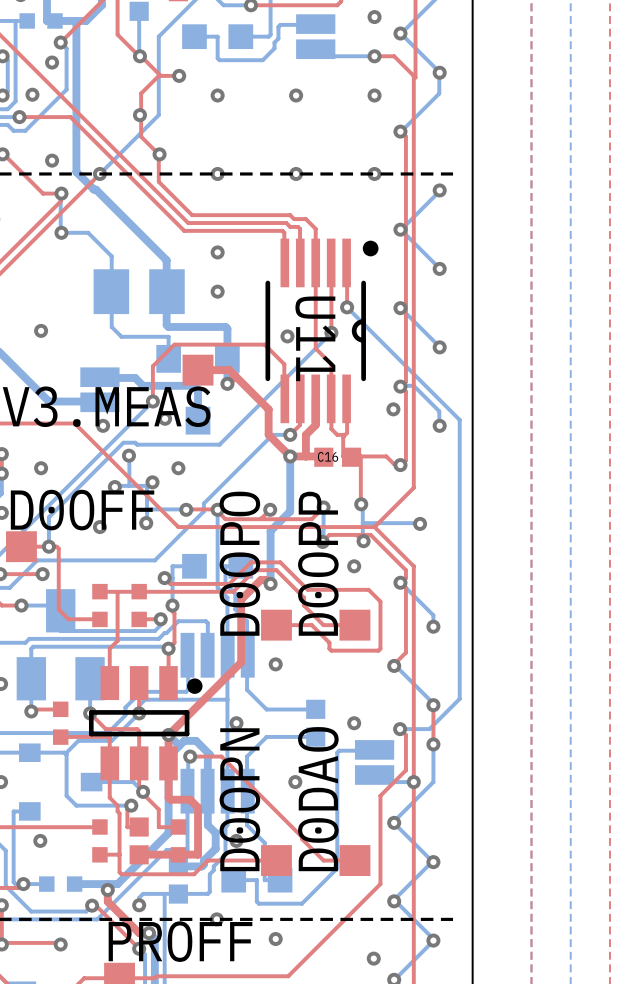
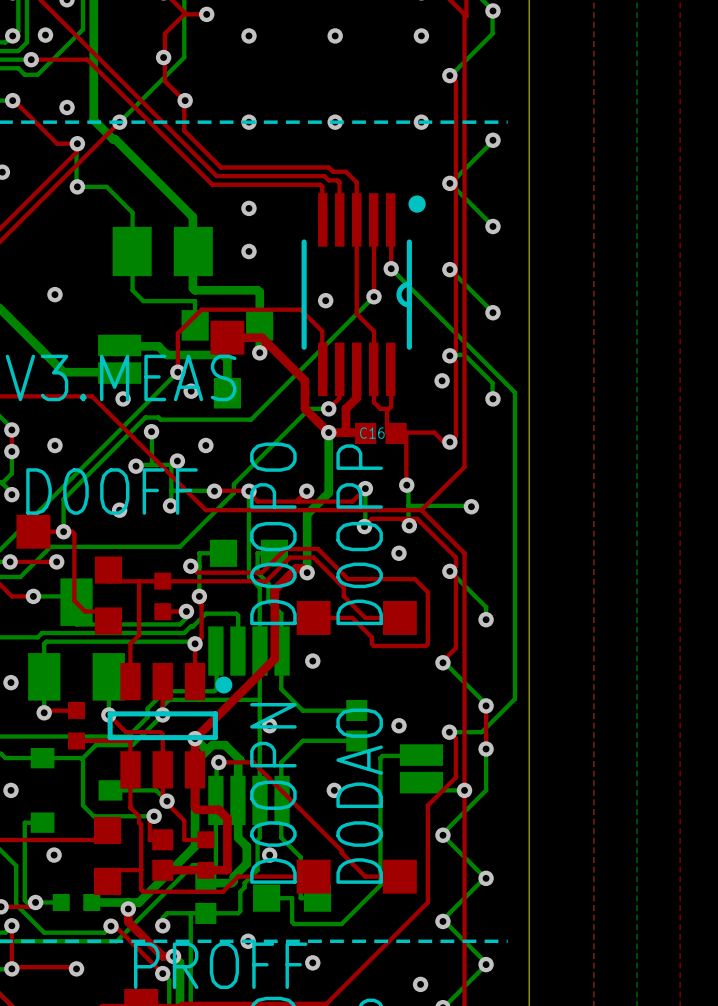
U11 name: U11 (315, 338) -> none
part footprint: [92, 583, 108, 628] -> [94, 556, 123, 635]
part footprint: [92, 819, 108, 863] -> [93, 816, 122, 895]

